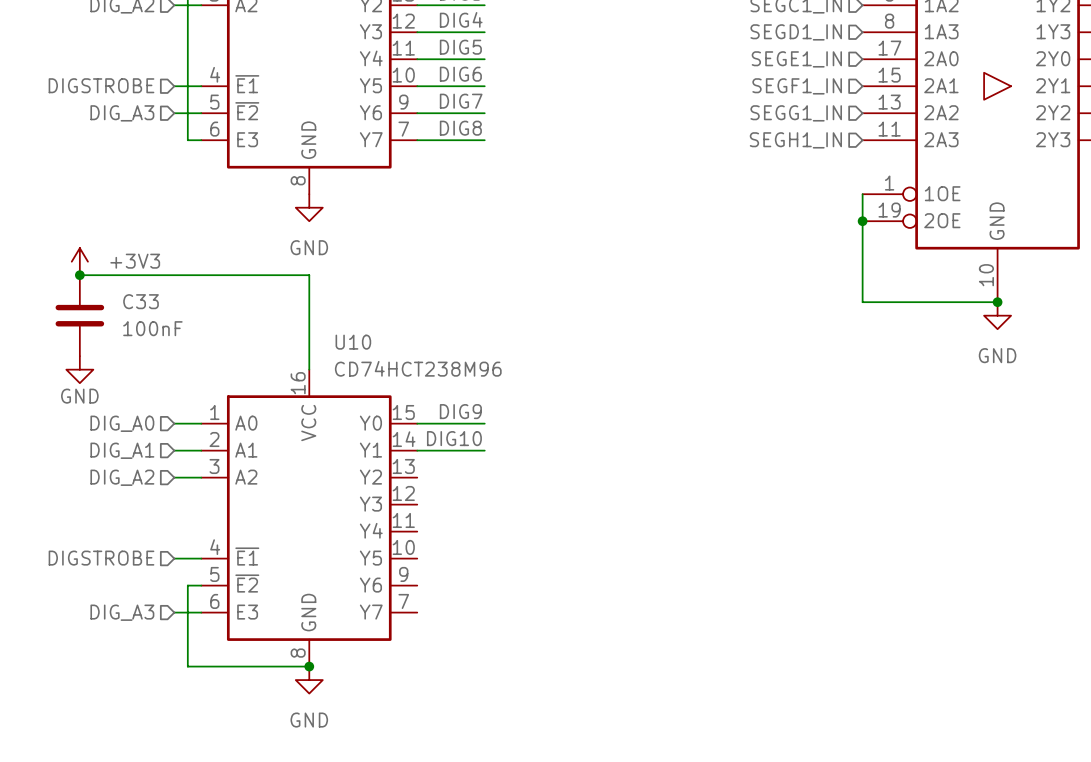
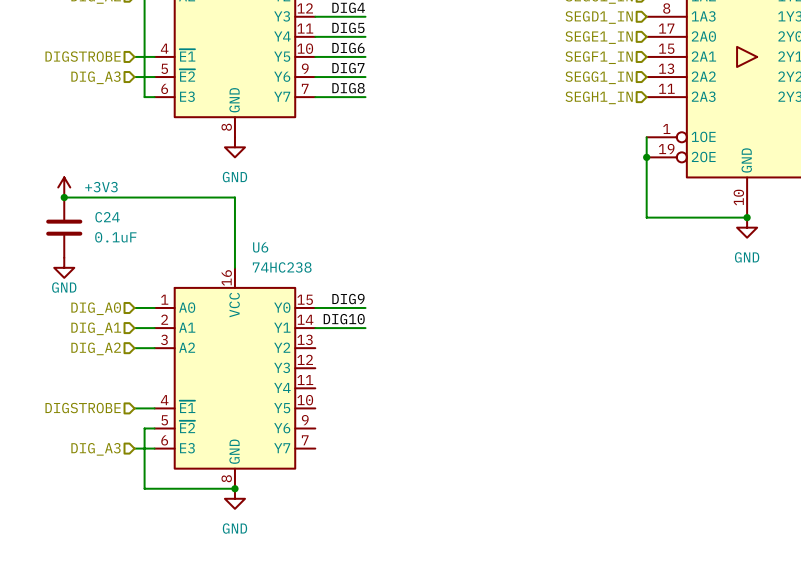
C33 name: C33 (141, 301) -> C24 (107, 217)
C33 value: 100nF (152, 328) -> 0.1uF (115, 237)
U10 name: U10 (353, 342) -> U6 (260, 247)
U10 value: CD74HCT238M96 (418, 368) -> 74HC238 (282, 267)

